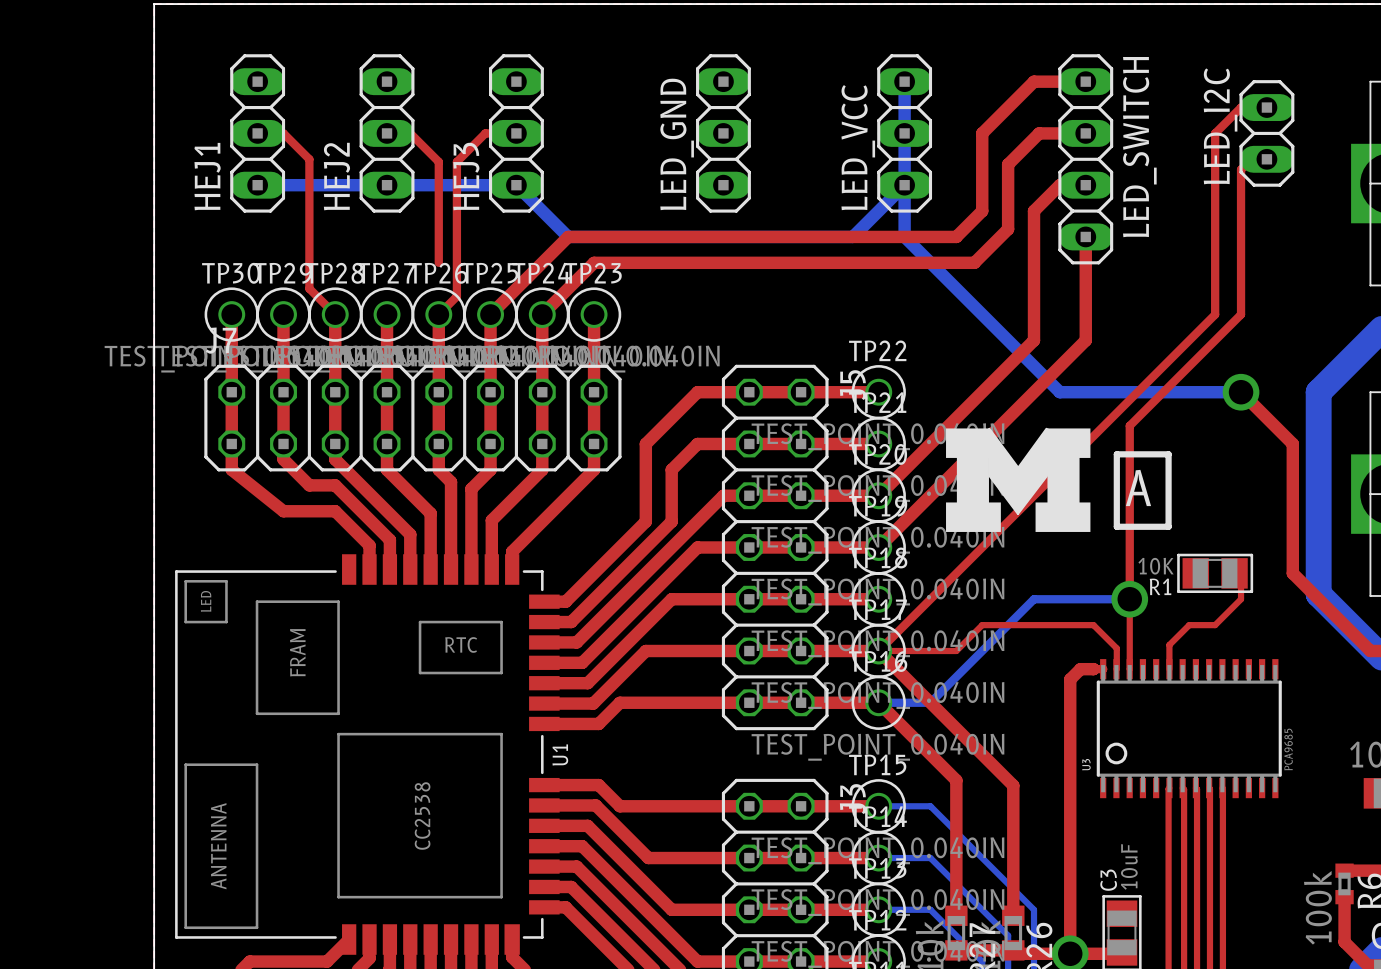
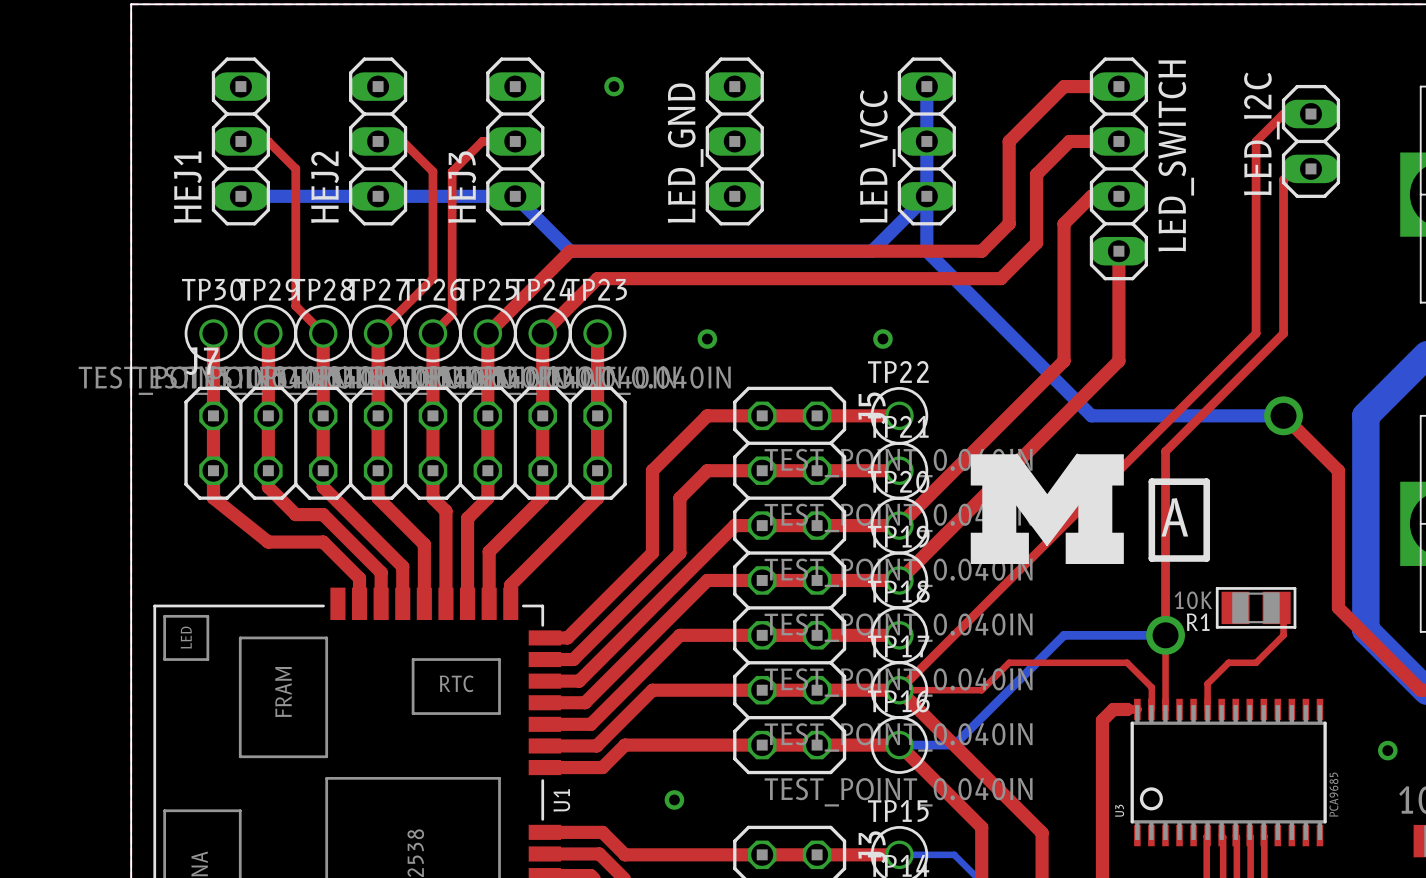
via: none -> (614, 86)
top track: none -> (432, 278) (378, 333)
via: none -> (707, 339)
via: none -> (882, 339)
via: none -> (1387, 750)
via: none -> (674, 799)

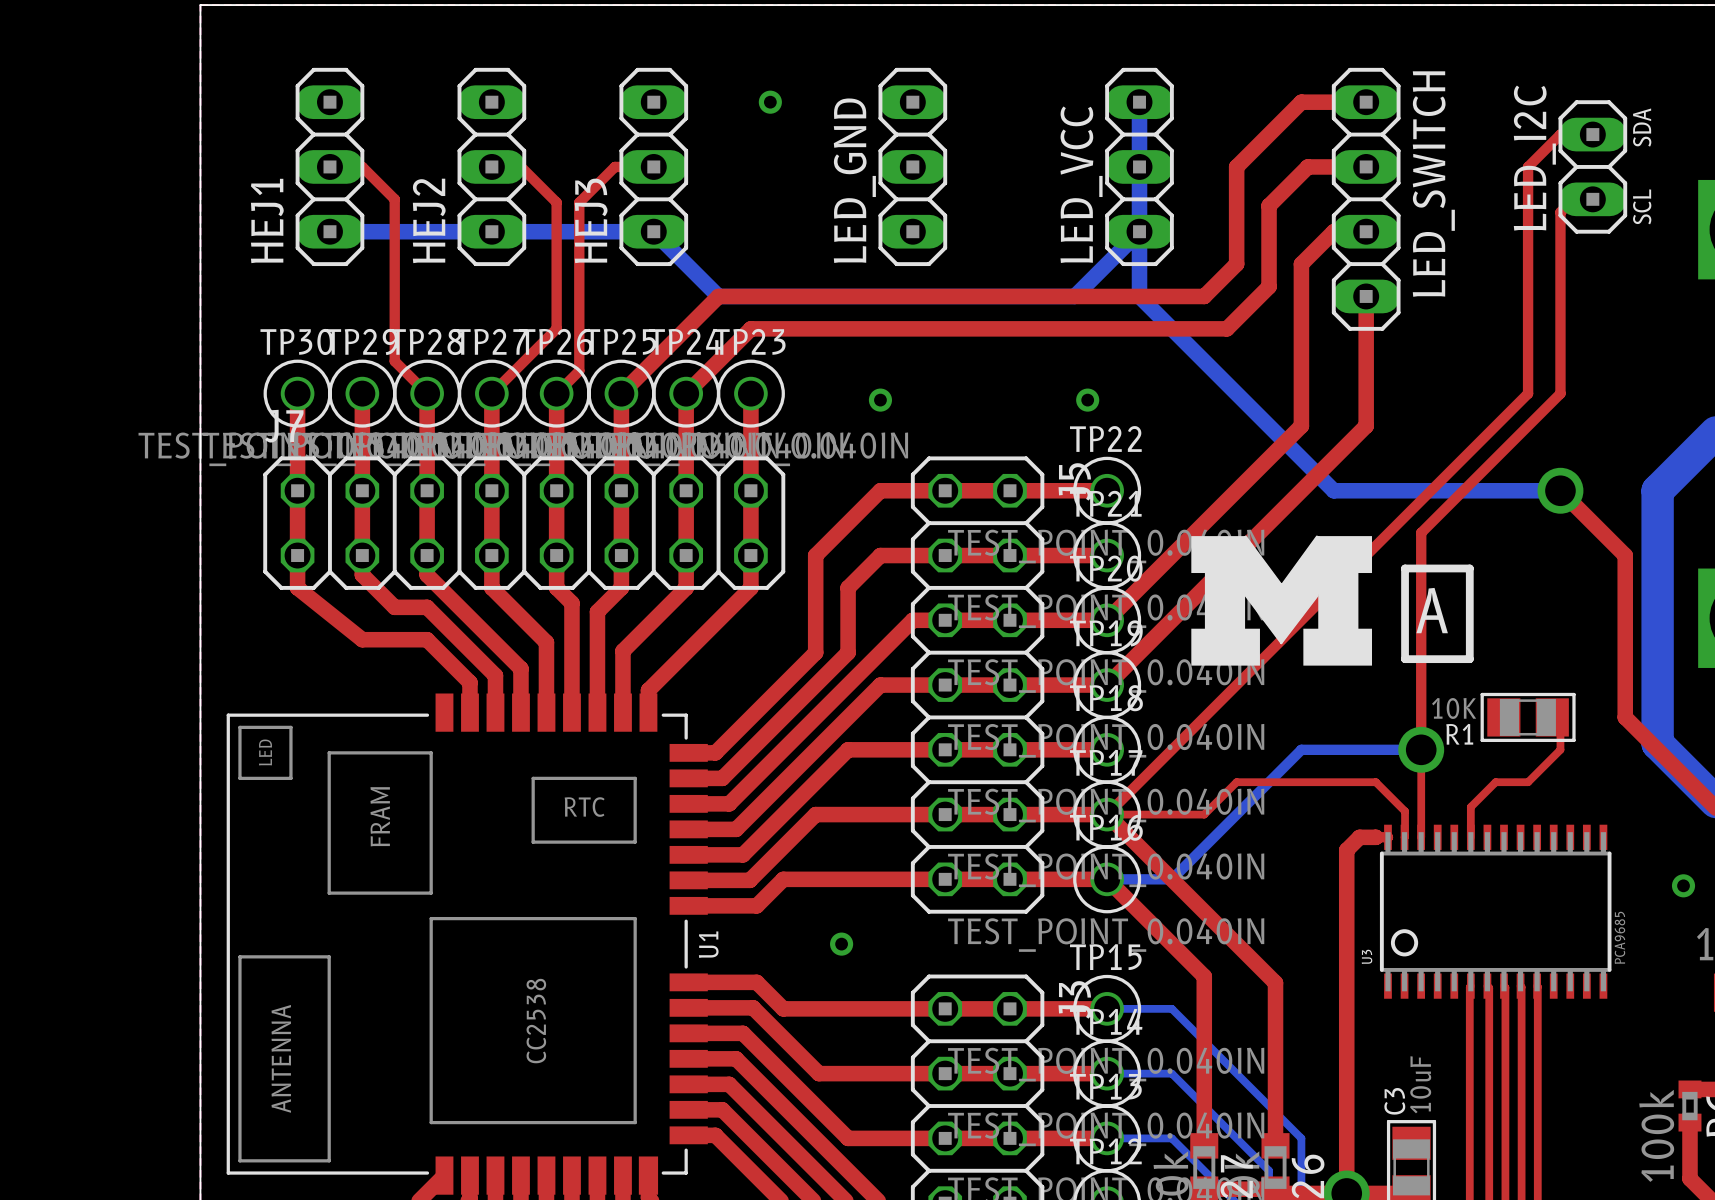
text: none -> SDA (1642, 127)
text: none -> SCL (1642, 206)

